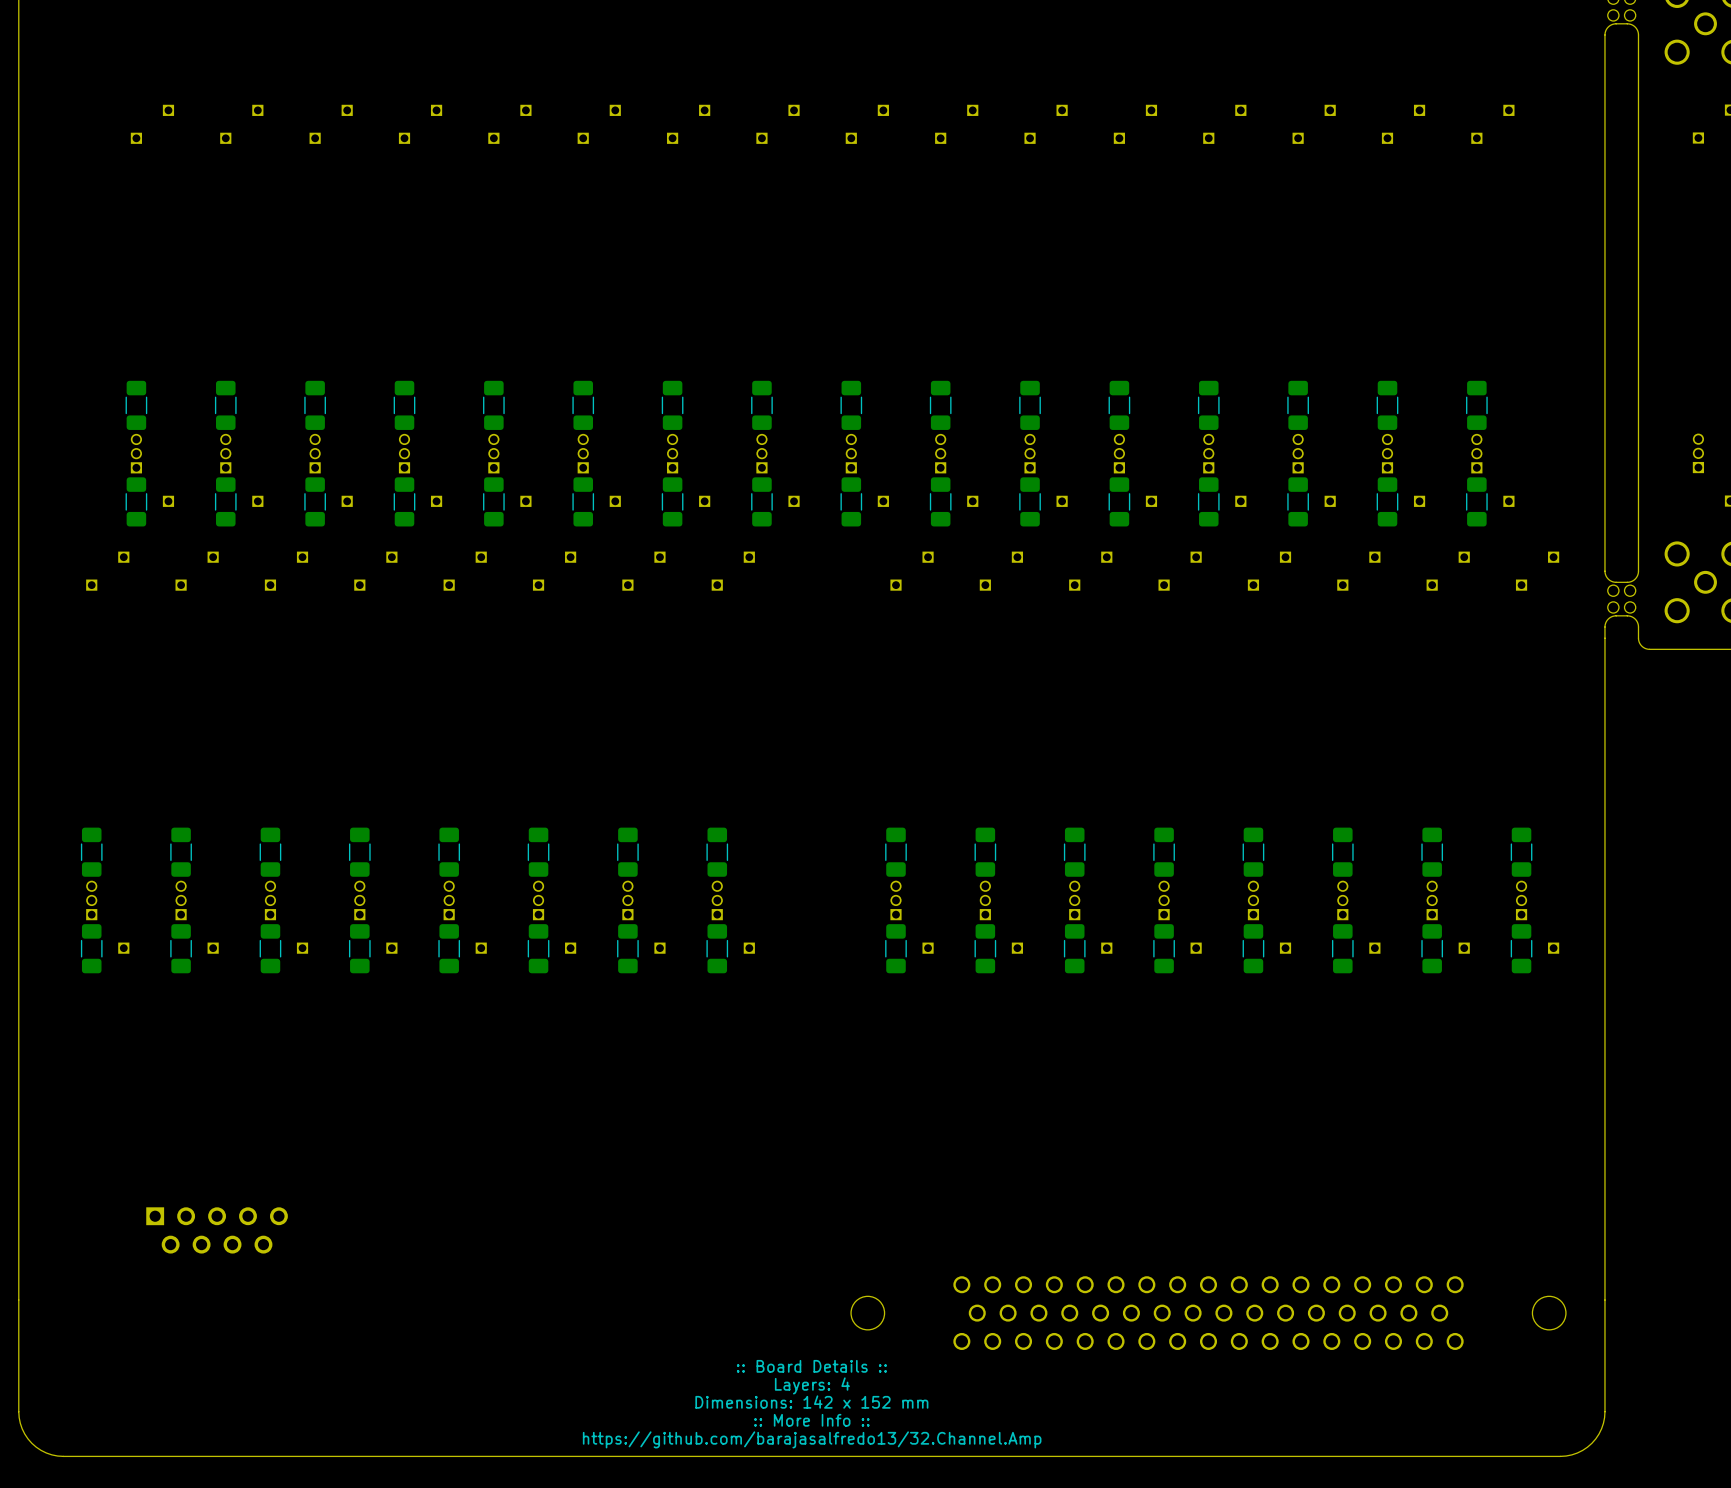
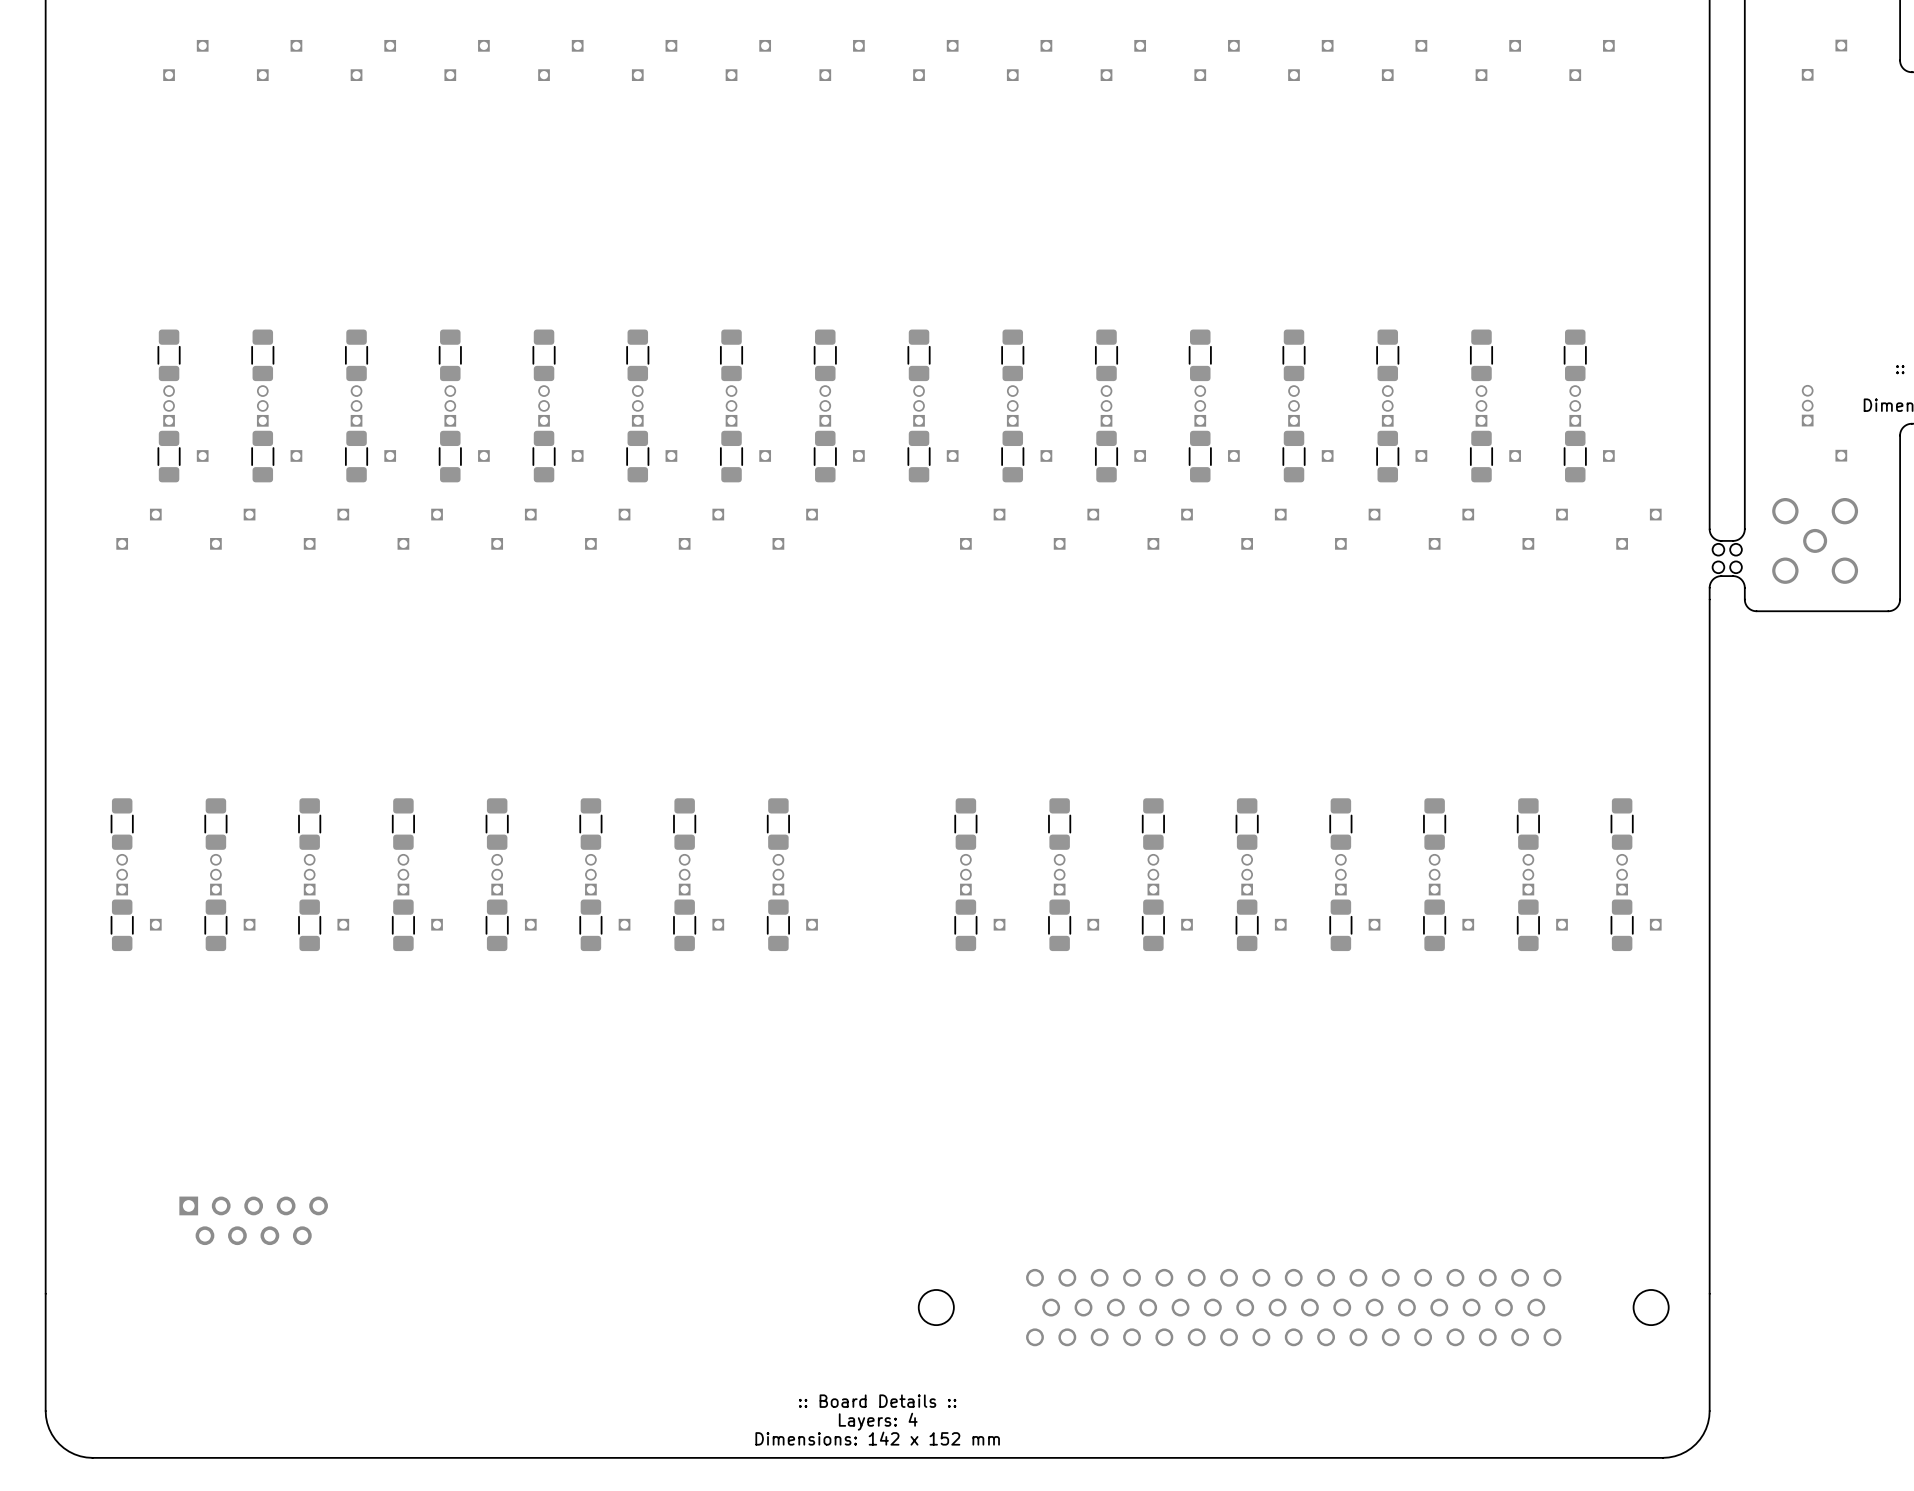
text: :: Board Details :: (811, 1366) -> none
text: Layers: 4 (812, 1385) -> none
text: Dimensions: 142 x 152 mm (811, 1402) -> :: Board Details :: (877, 1401)
text: :: More Info :: (811, 1420) -> Layers: 4 (878, 1421)
text: https://github.com/barajasalfredo13/32.Channel.Amp (812, 1439) -> Dimensions: 142 x 152 mm (877, 1438)

